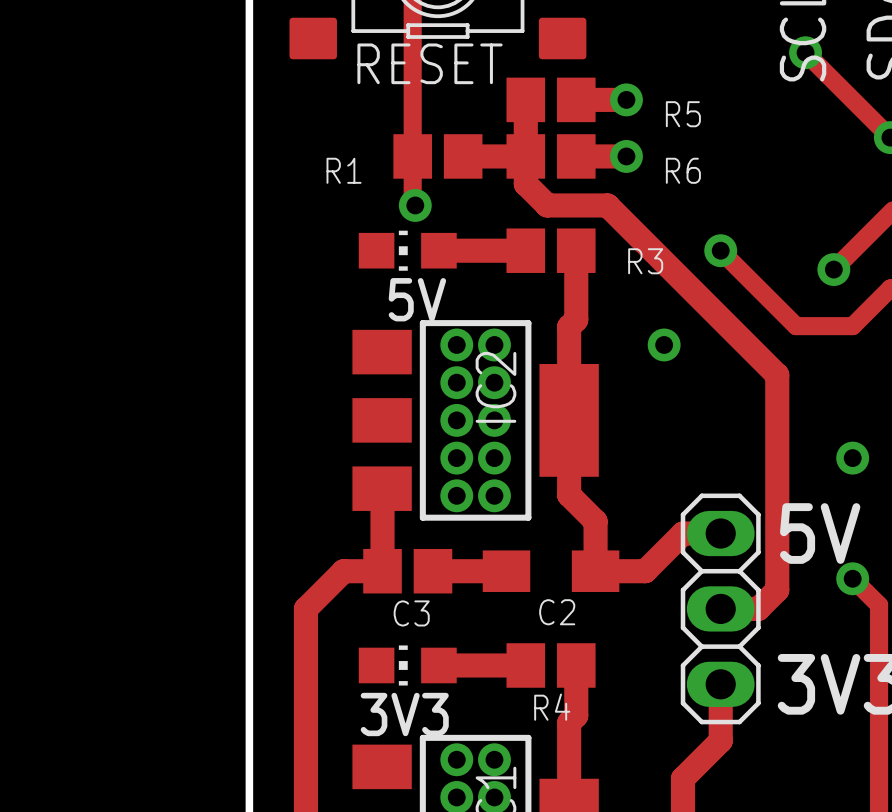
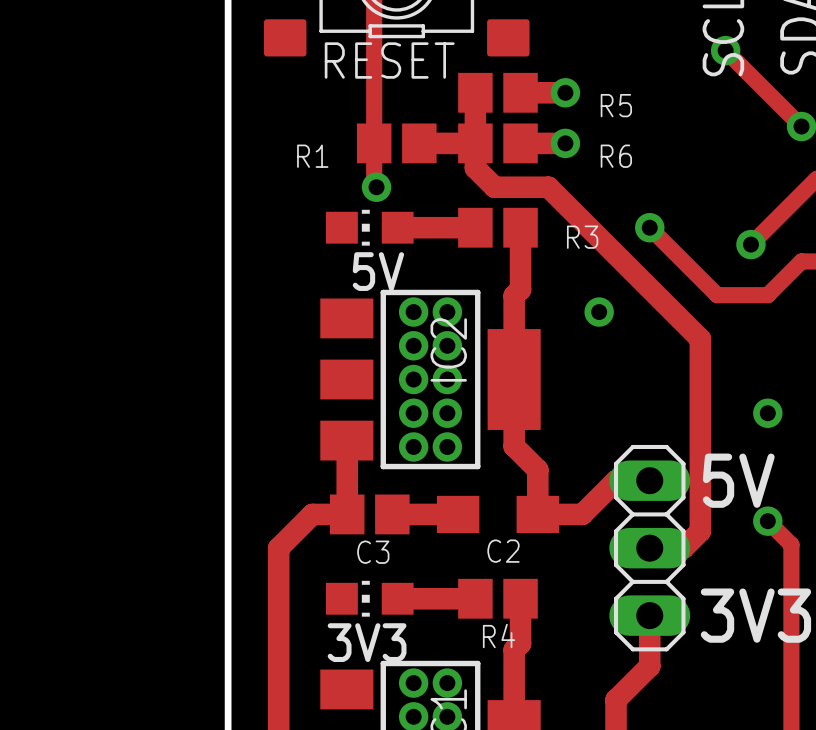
part footprint: [680, 493, 761, 725] -> [609, 444, 691, 652]

